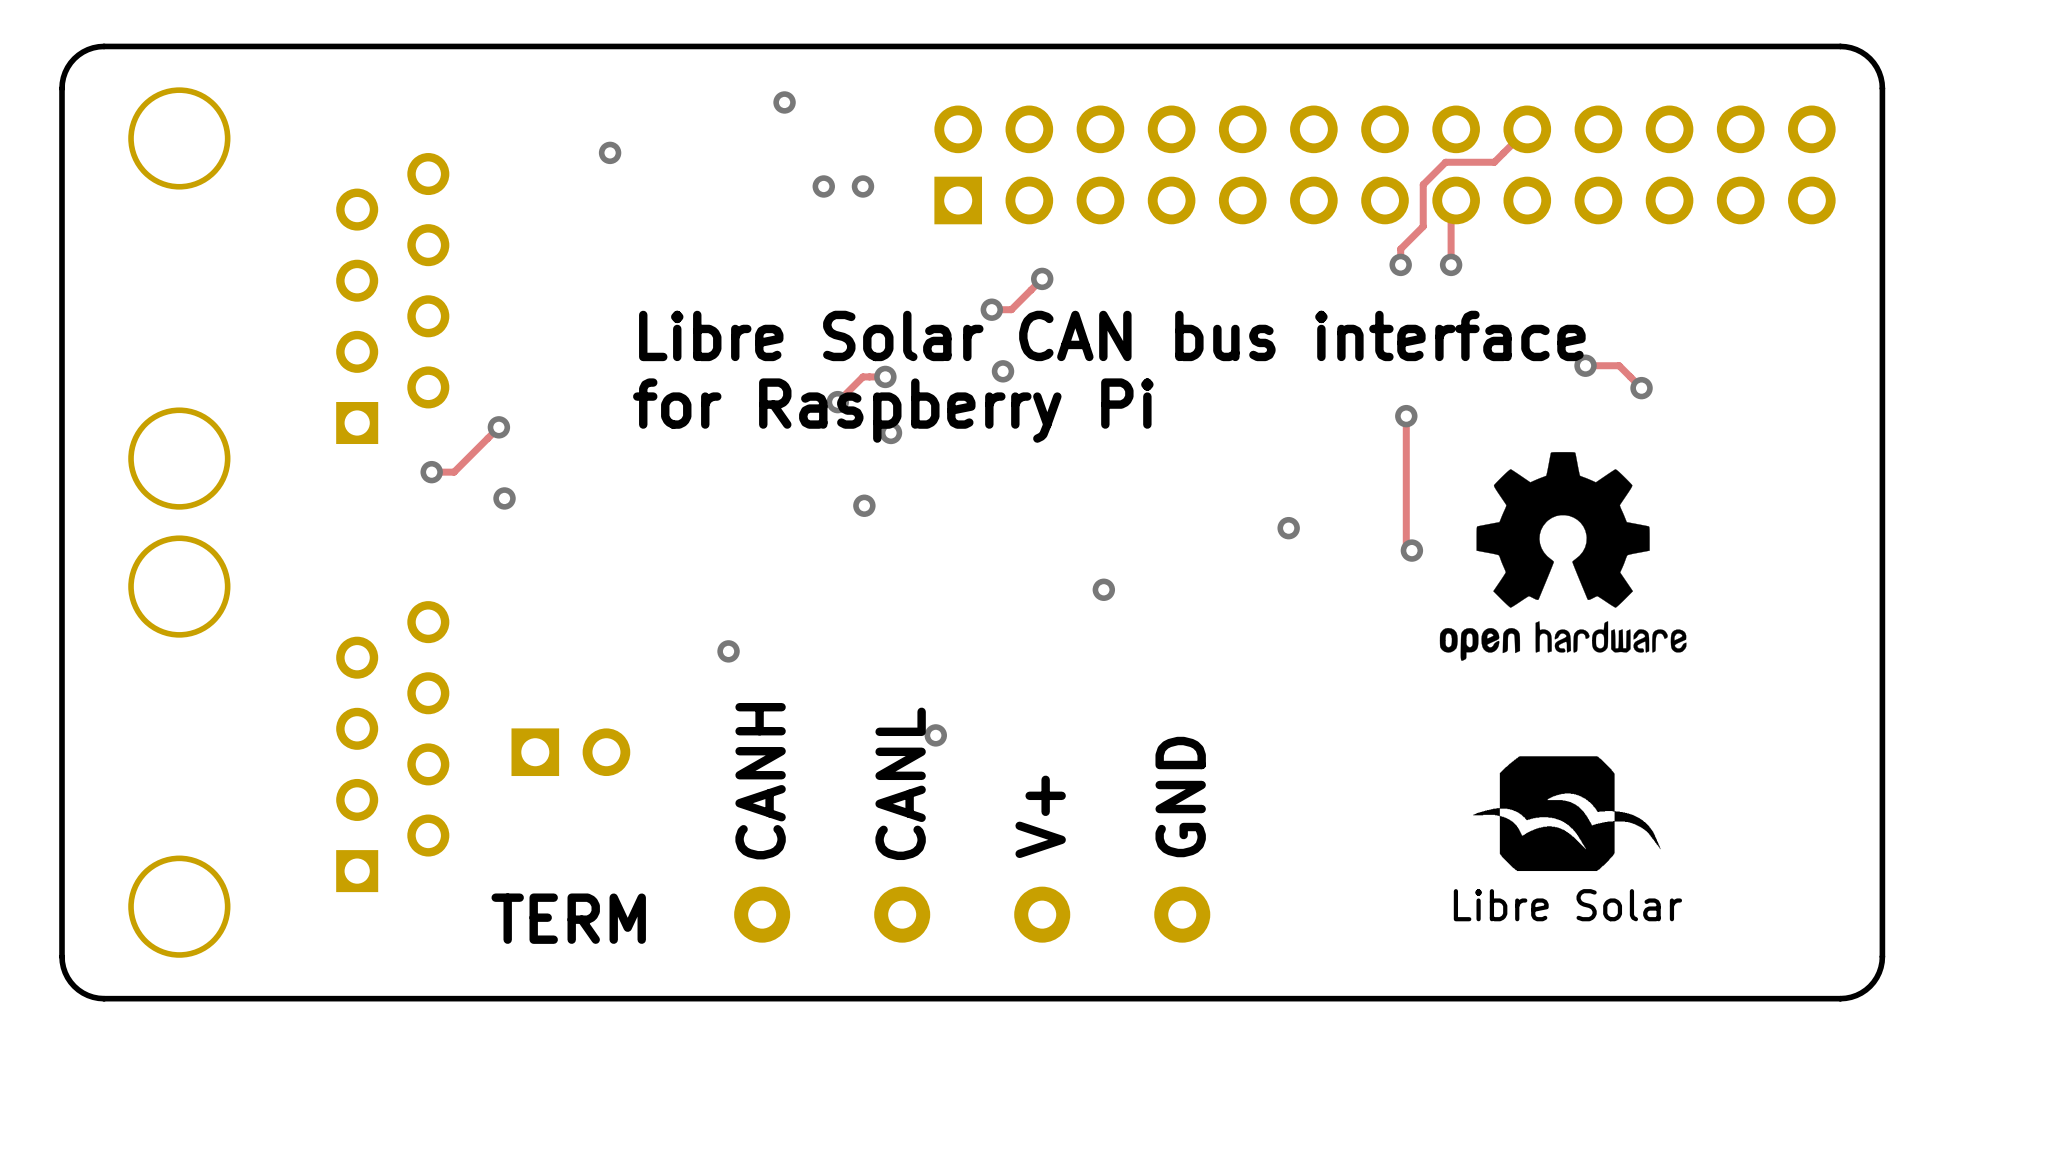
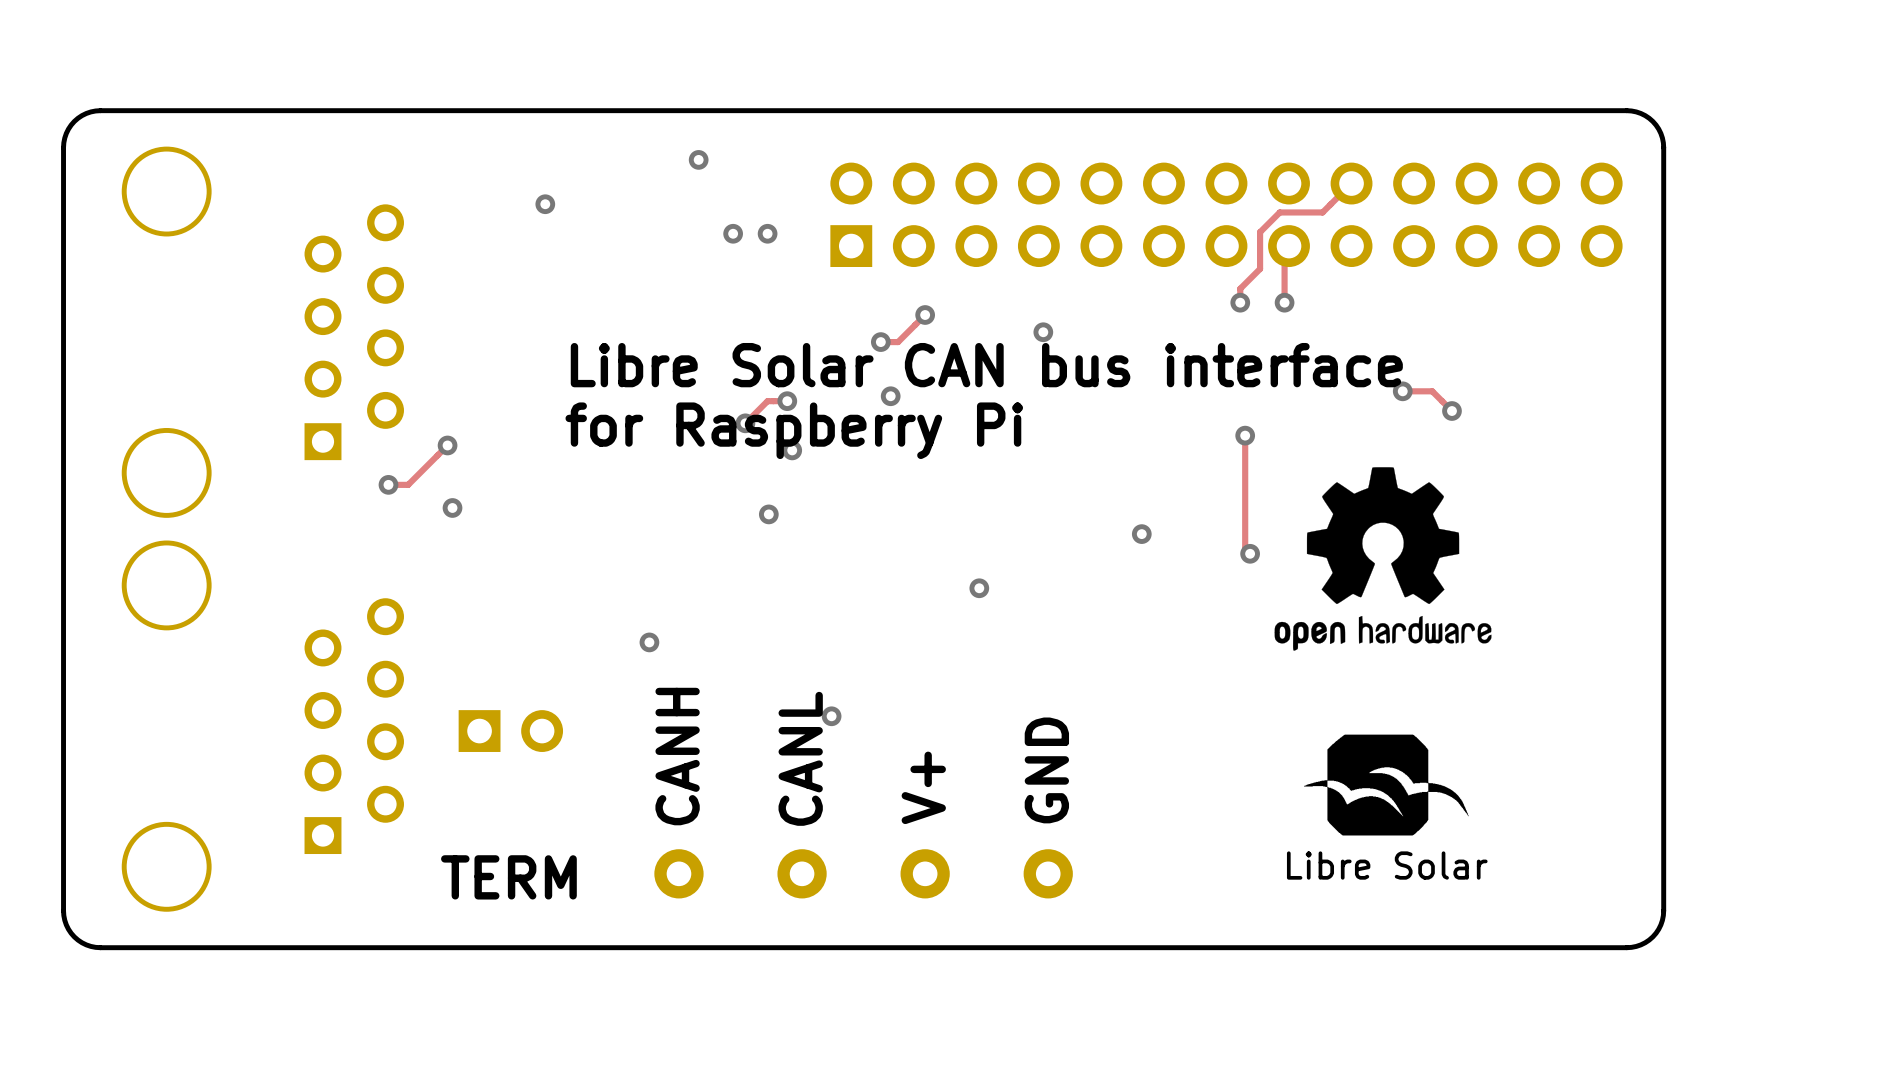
via: none -> (1043, 332)

